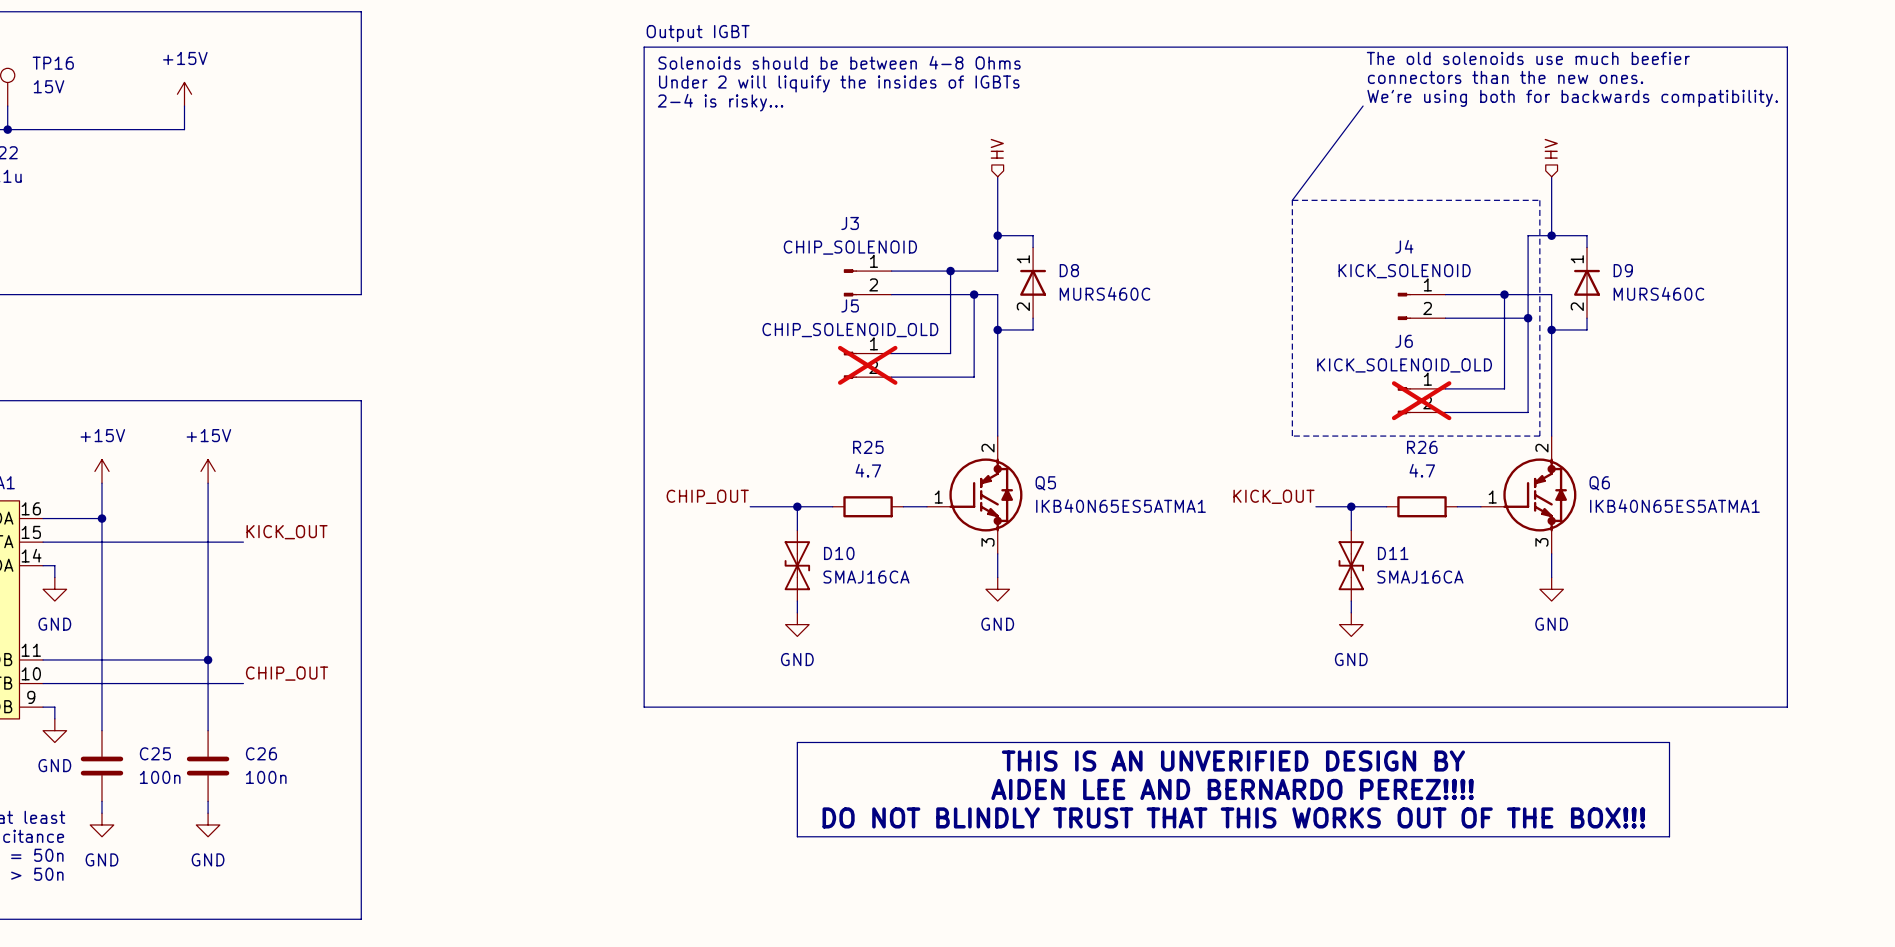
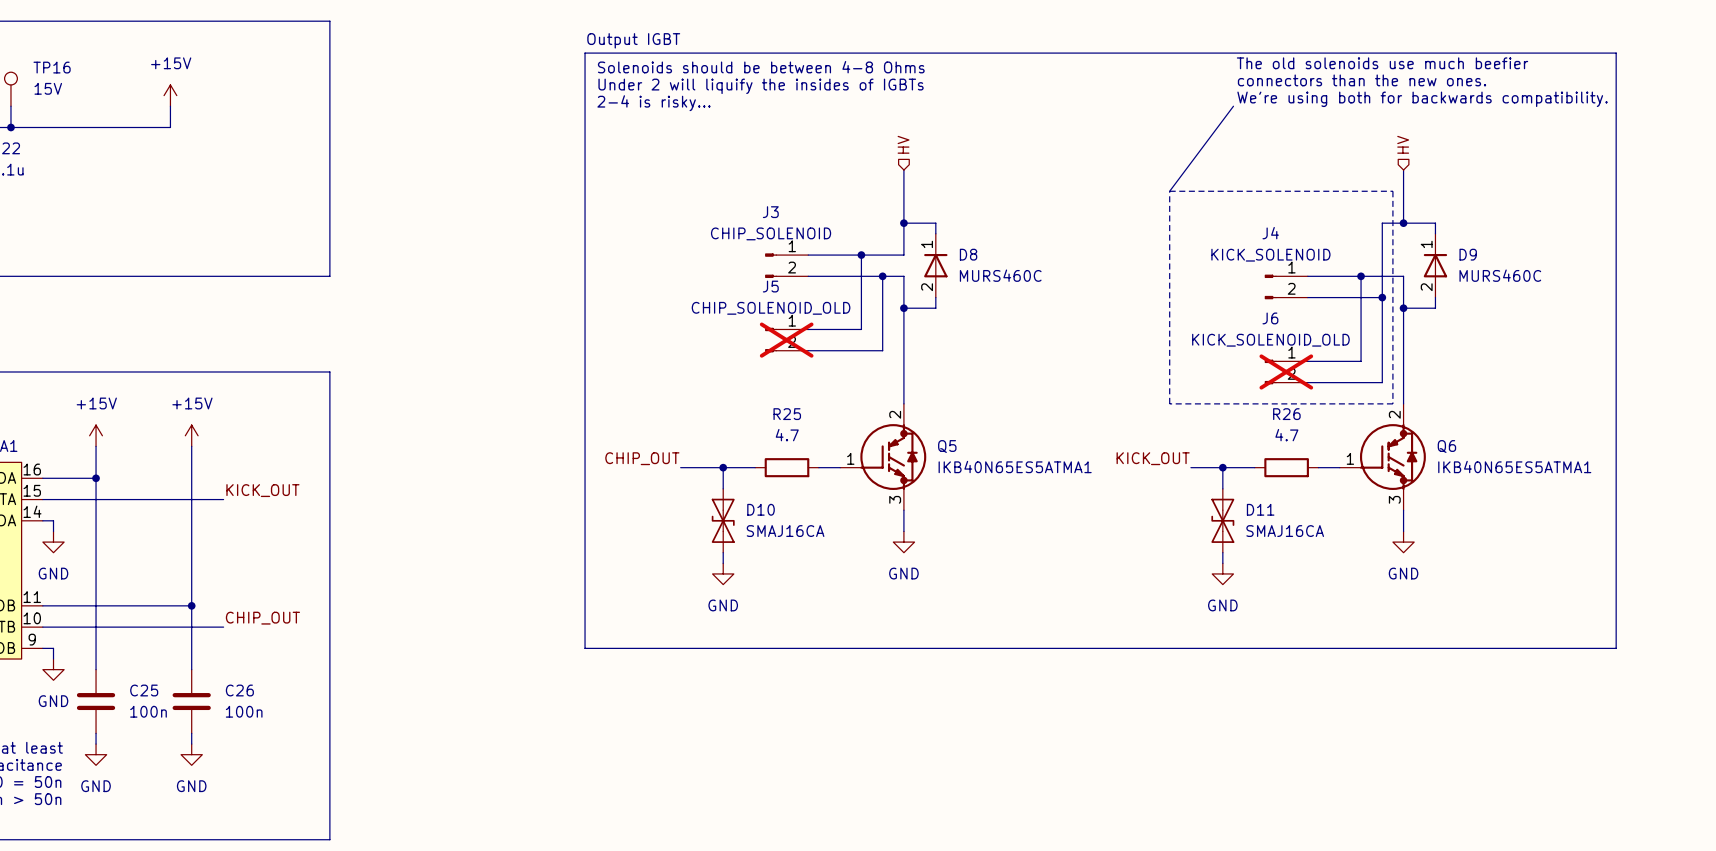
line: (797, 742) (1669, 742) (1669, 836) (797, 836) (797, 742) -> none
text: THIS IS AN UNVERIFIED DESIGN BY (1233, 761) -> none
text: AIDEN LEE AND BERNARDO PEREZ!!!! (1232, 789) -> none
text: DO NOT BLINDLY TRUST THAT THIS WORKS OUT OF THE BOX!!! (1233, 817) -> none

